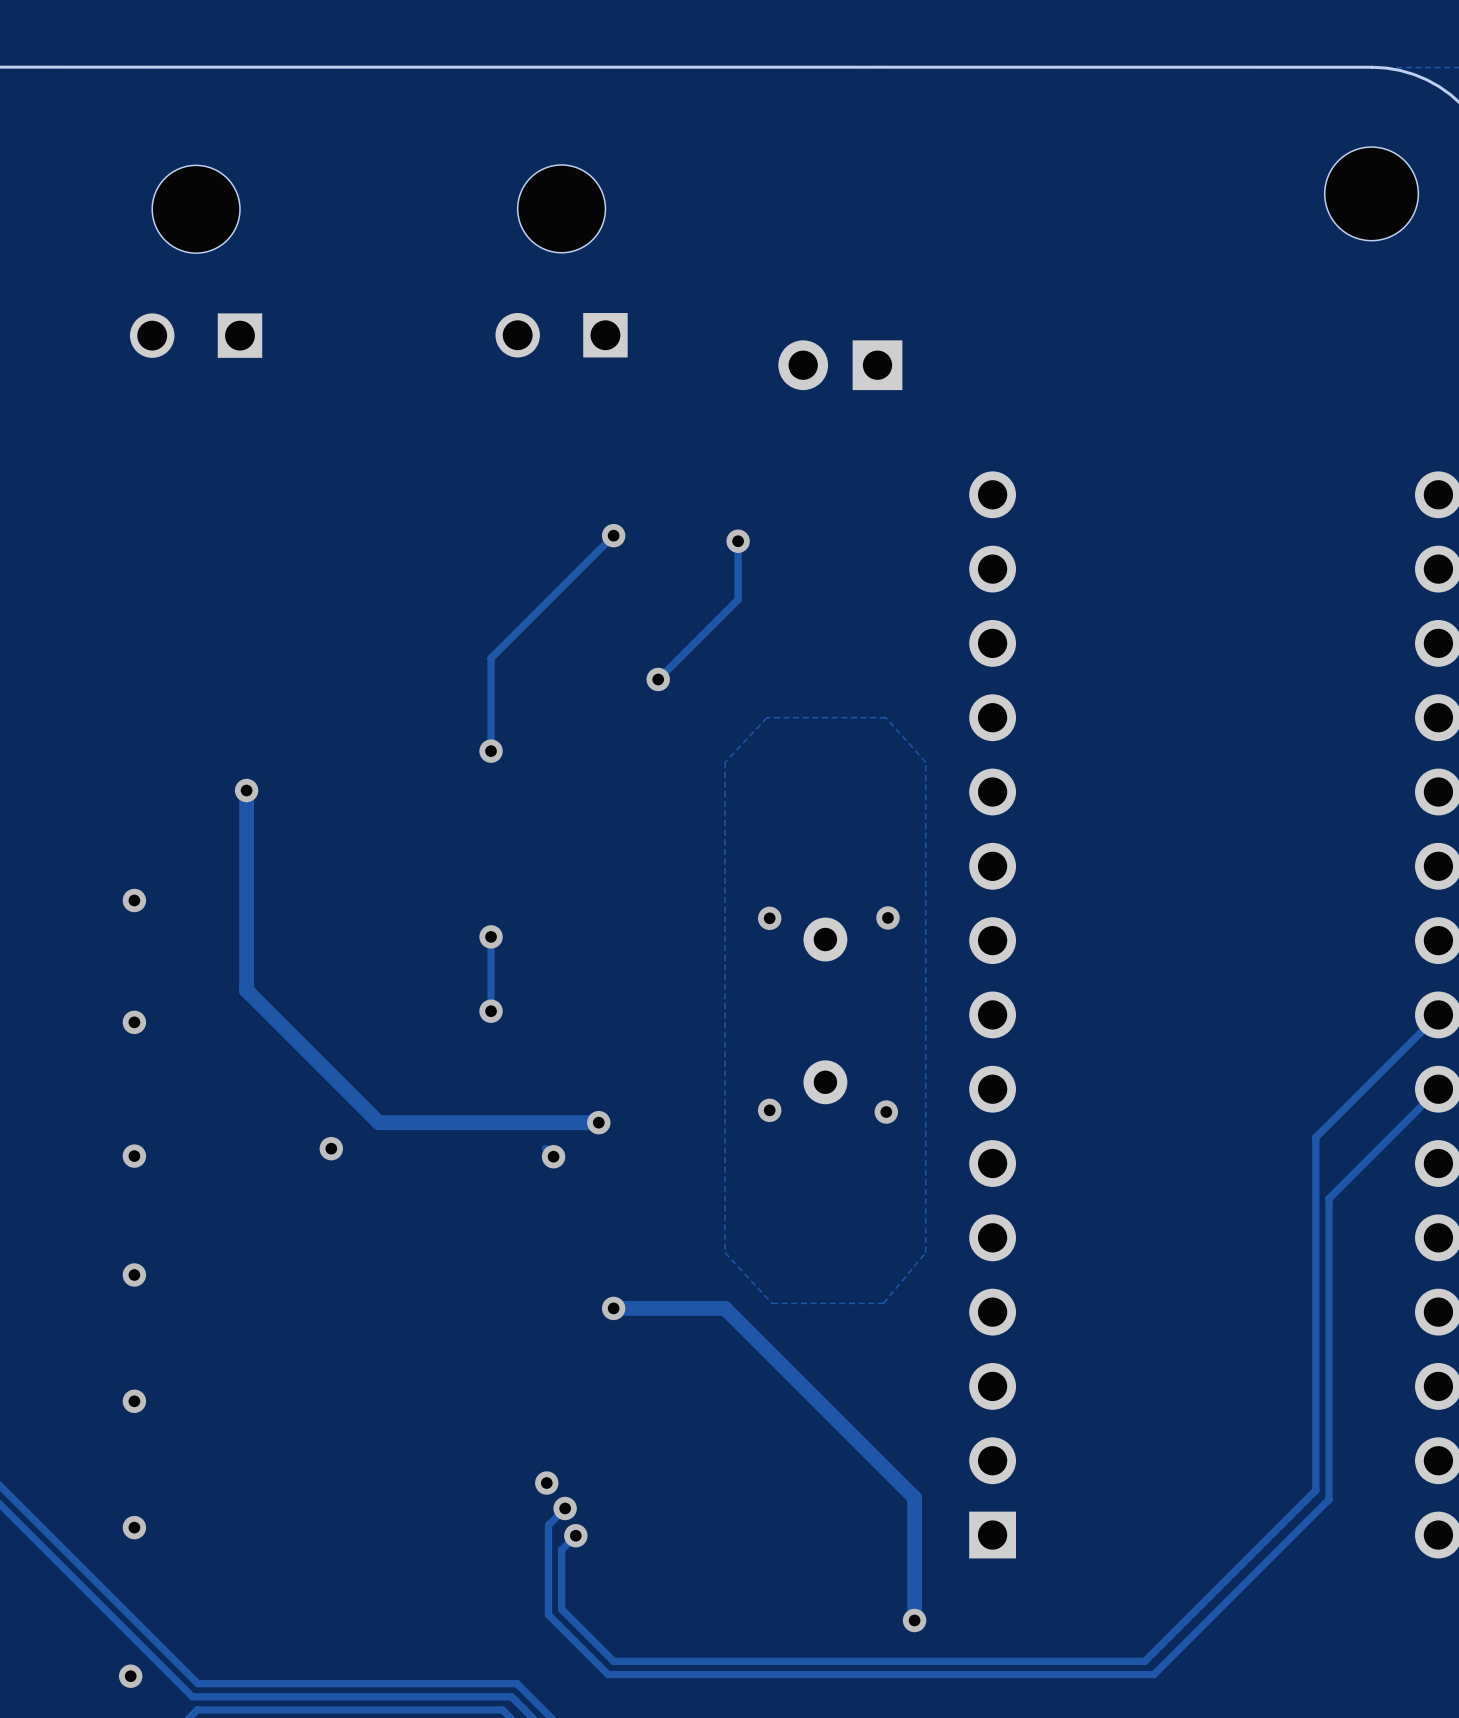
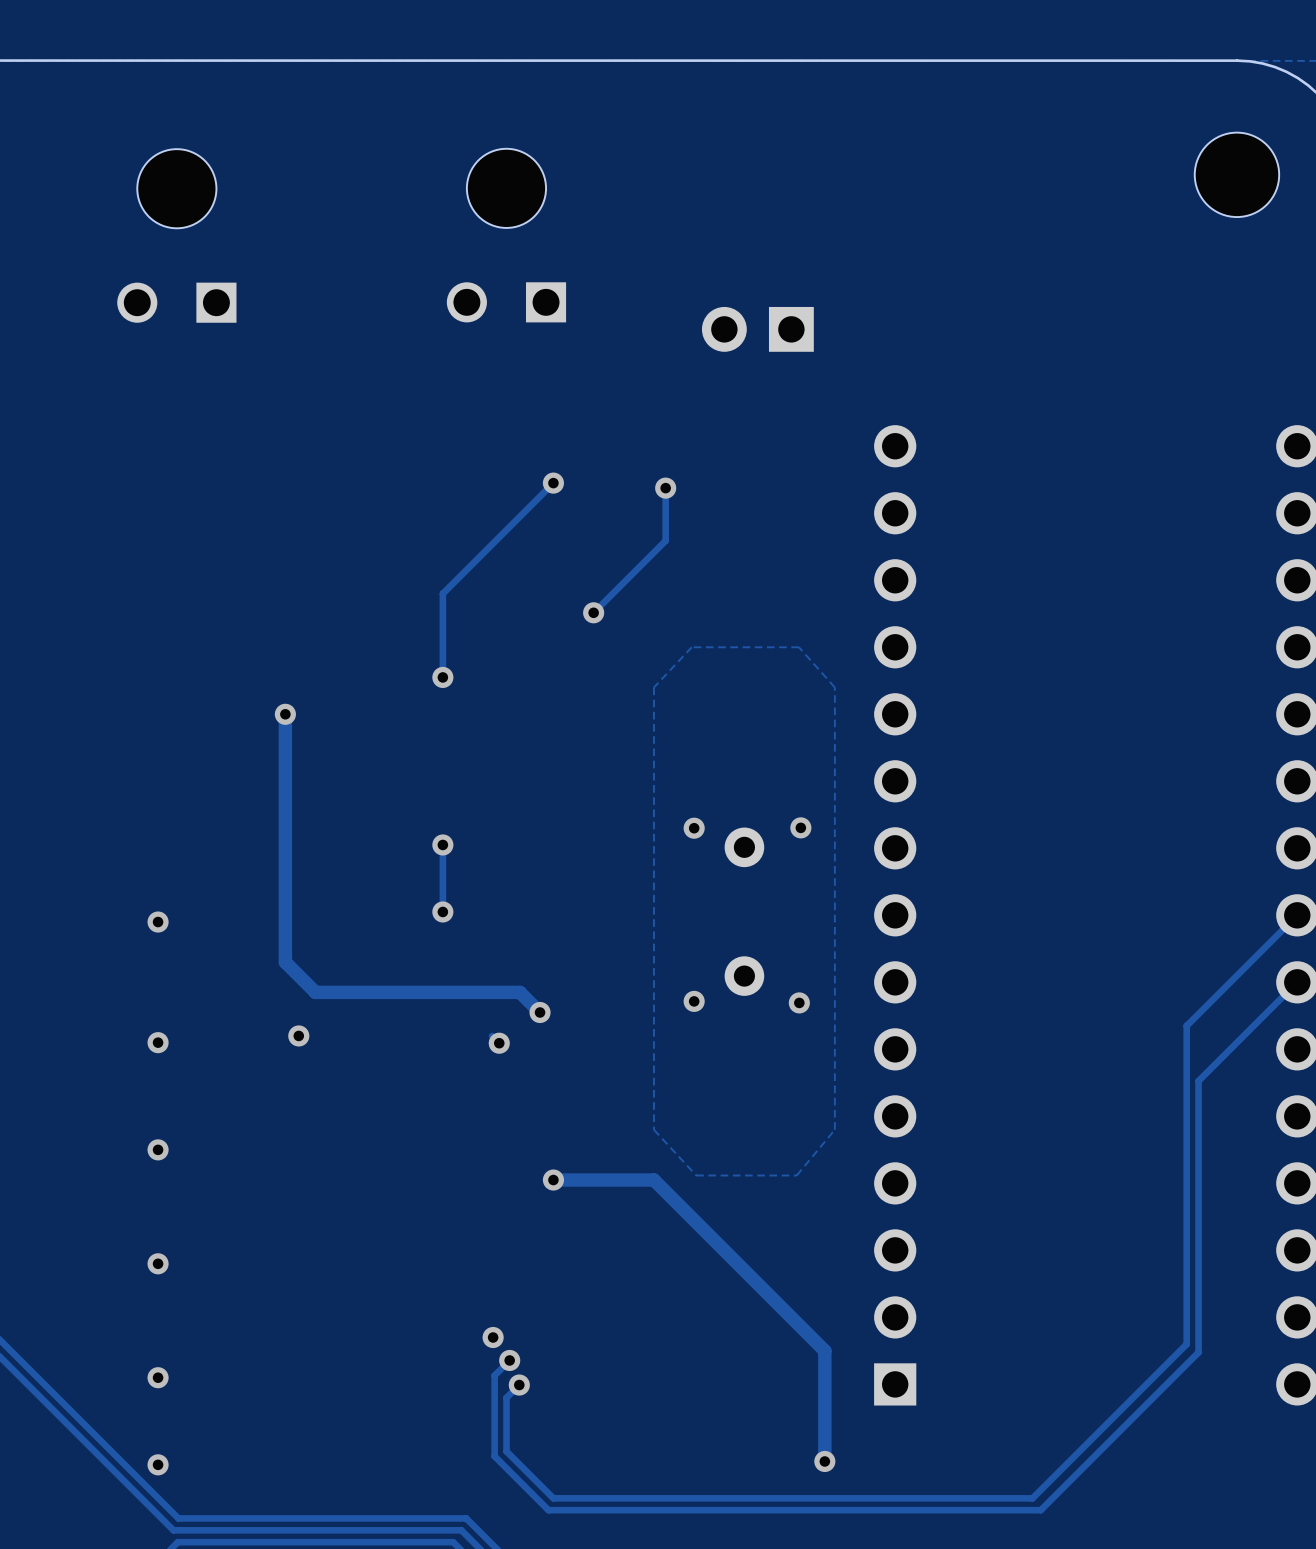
track: (246, 790) (246, 990) (378, 1122) (598, 1122) -> (285, 714) (285, 962) (315, 992) (519, 992) (540, 1012)
via position: (246, 790) -> (285, 714)
via: (134, 900) -> none
via position: (134, 1022) -> (158, 922)
via position: (134, 1156) -> (158, 1042)
via position: (134, 1274) -> (158, 1149)
via position: (134, 1401) -> (158, 1263)
via position: (134, 1527) -> (158, 1377)
via: none -> (158, 1464)
via: (130, 1676) -> none

